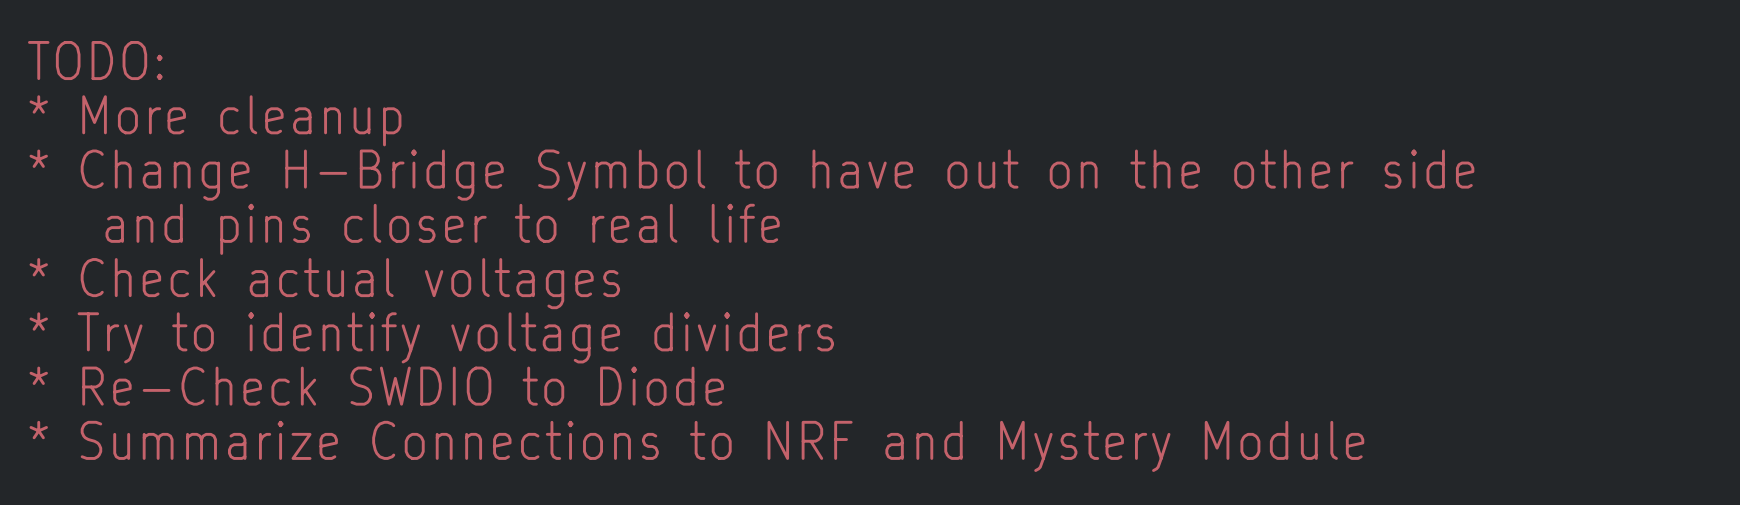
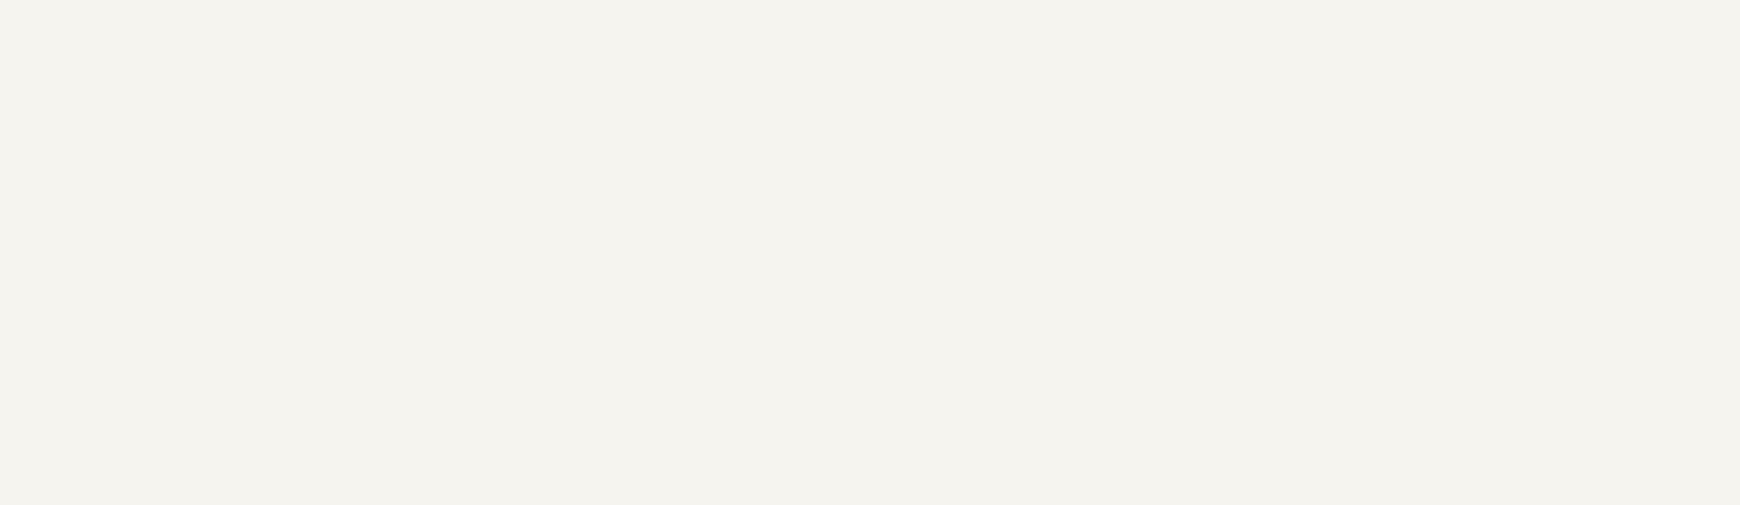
text: TODO: (95, 60) -> none
text: * More cleanup (215, 120) -> none
text: * Change H-Bridge Symbol to have out on the other side (751, 175) -> none
text: and pins closer to real life (442, 229) -> none
text: * Check actual voltages (324, 283) -> none
text: * Try to identify voltage dividers (431, 337) -> none
text: * Re-Check SWDIO to Diode (376, 386) -> none
text: * Summarize Connections to NRF and Mystery Module (696, 446) -> none

